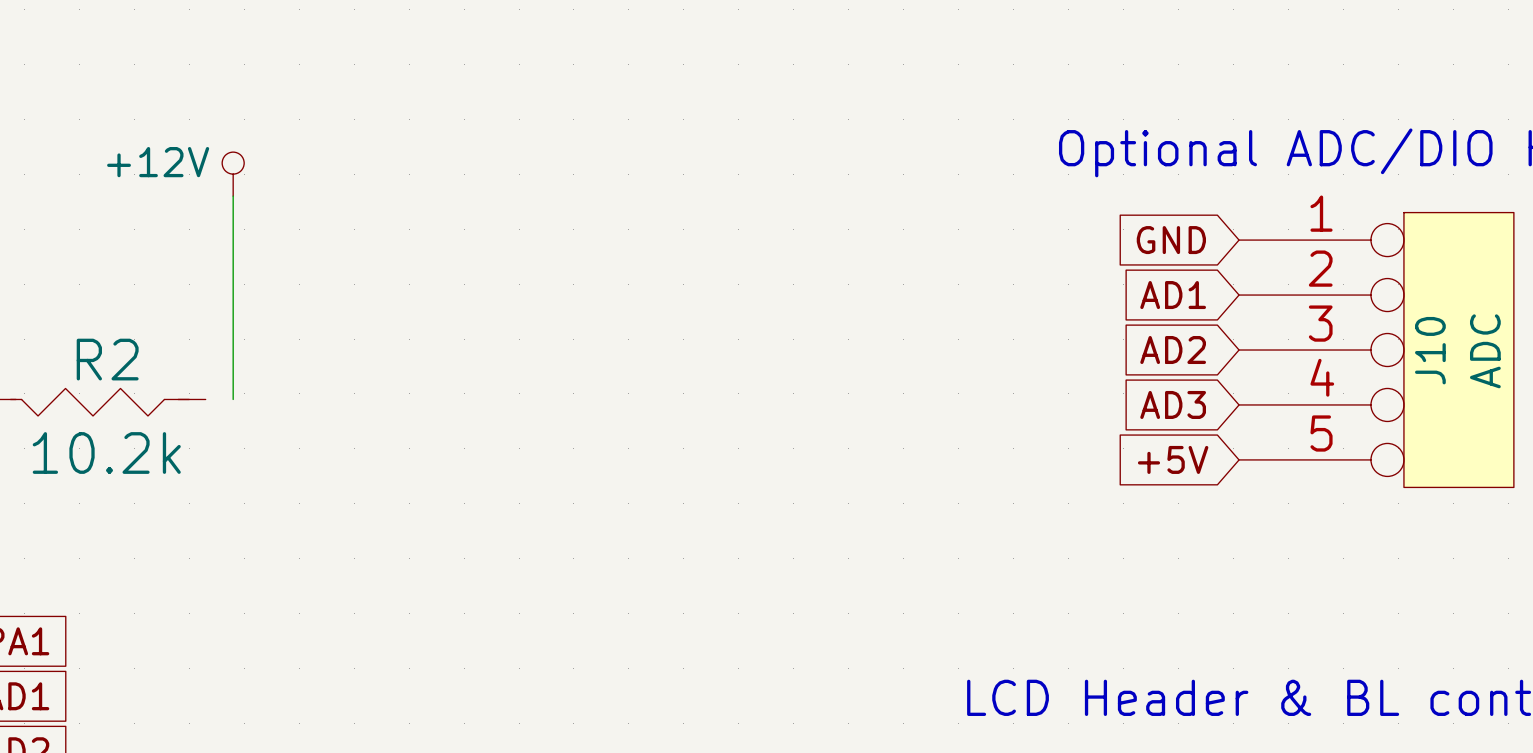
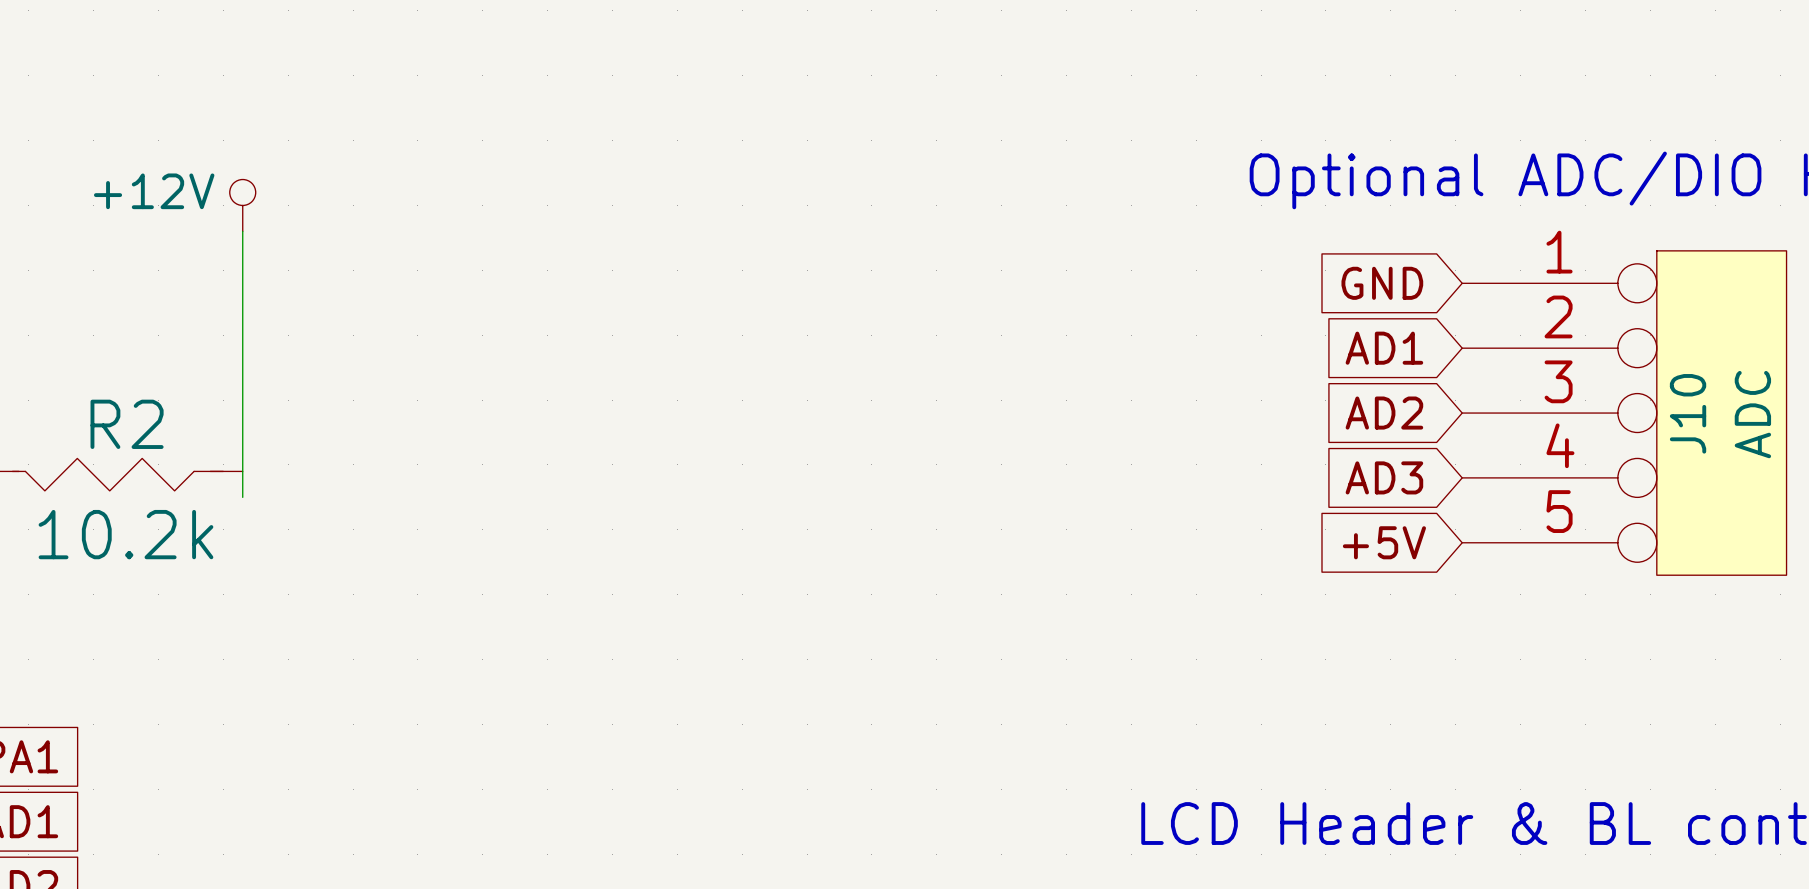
power symbol position: +12V (233, 174) -> +12V (242, 205)
wire: none -> (242, 231) (242, 497)
wire: (233, 196) (233, 399) -> none

